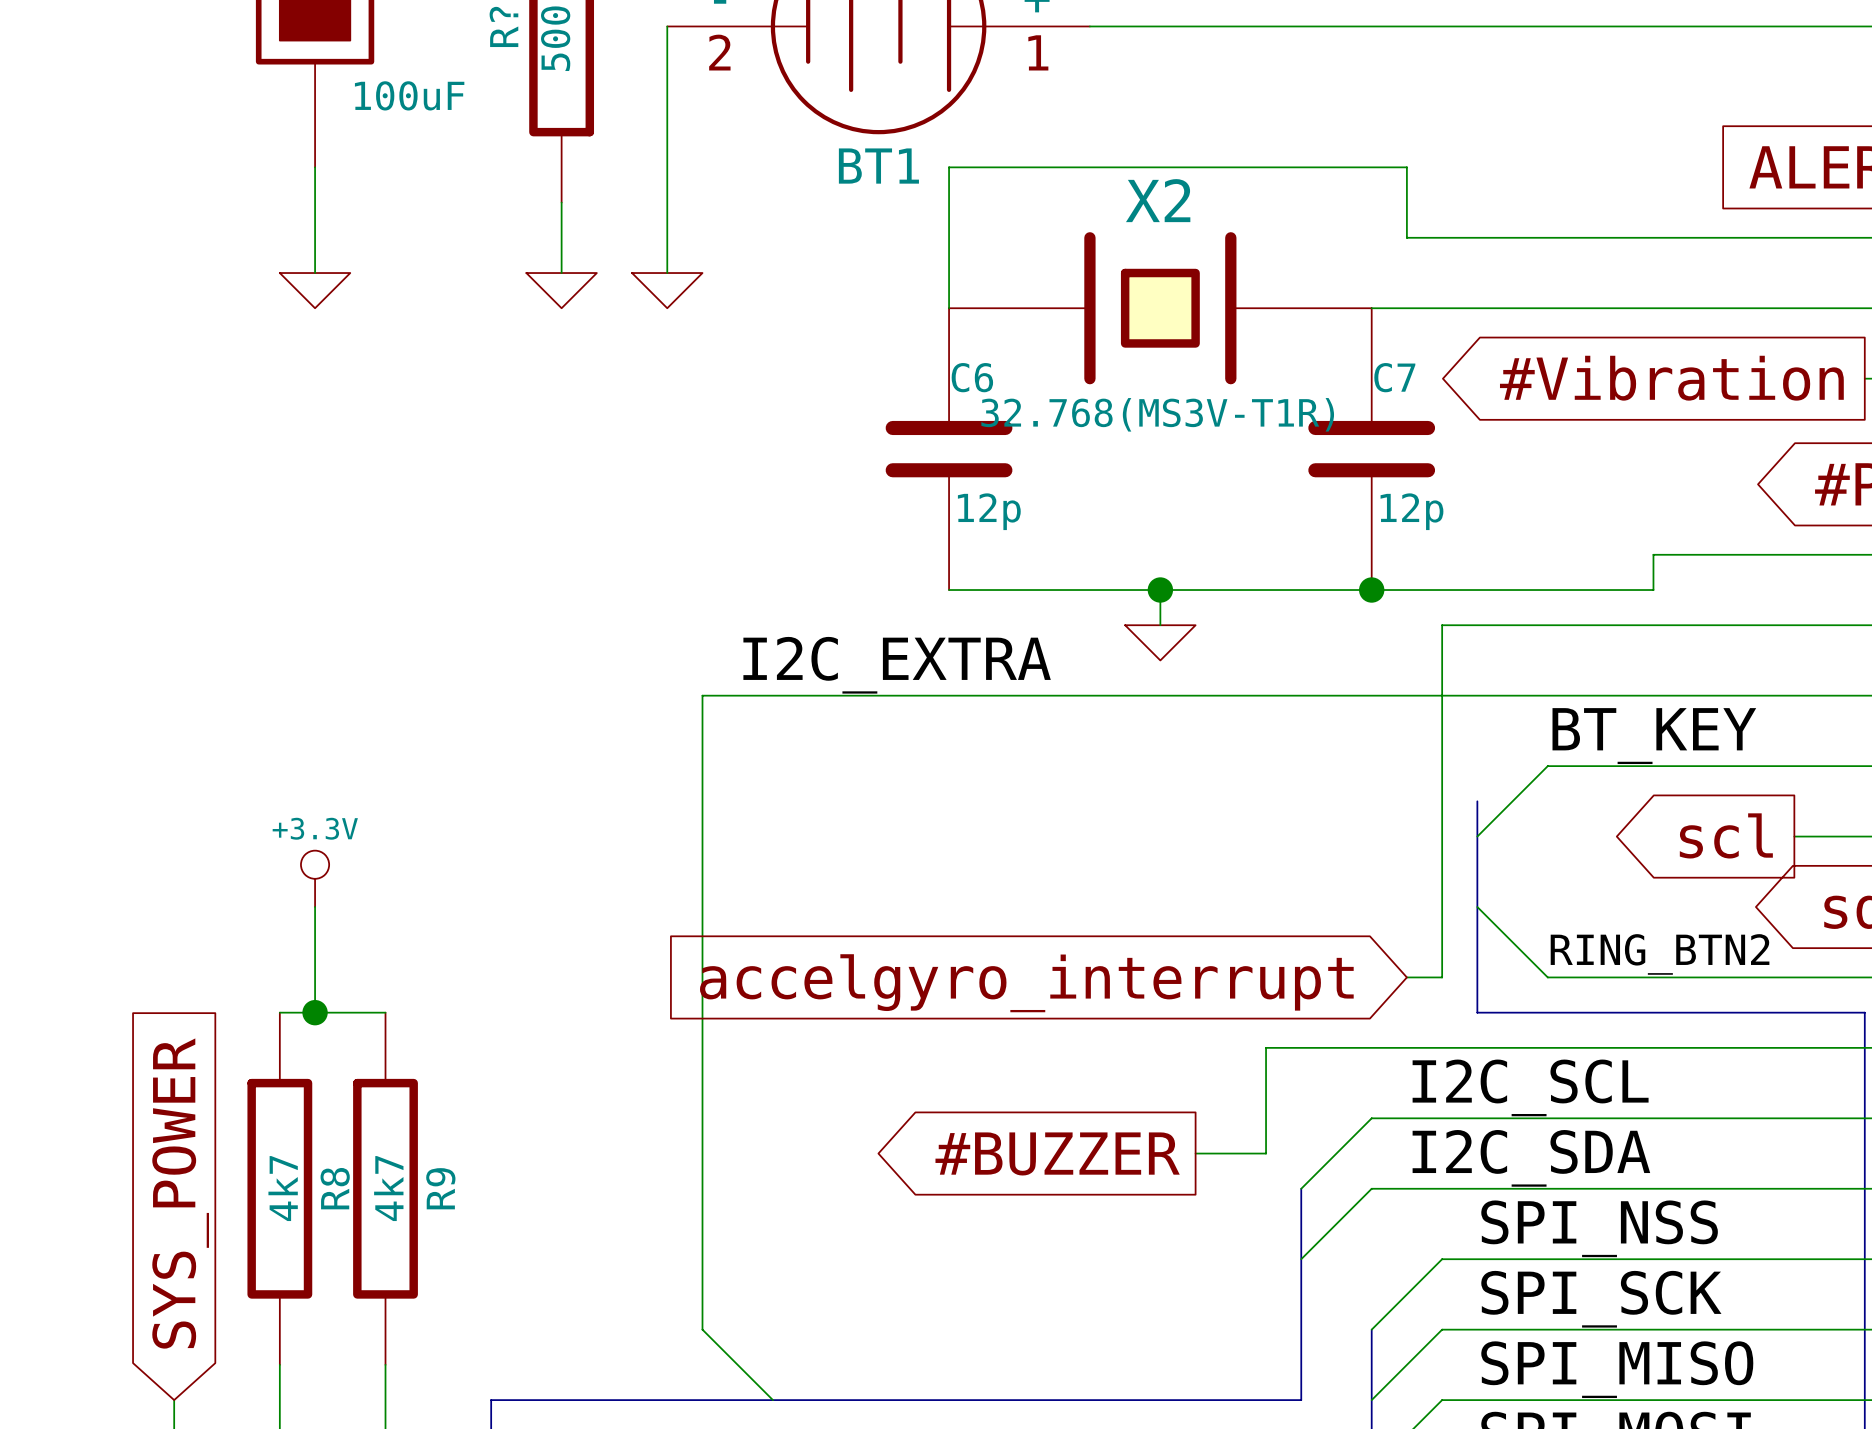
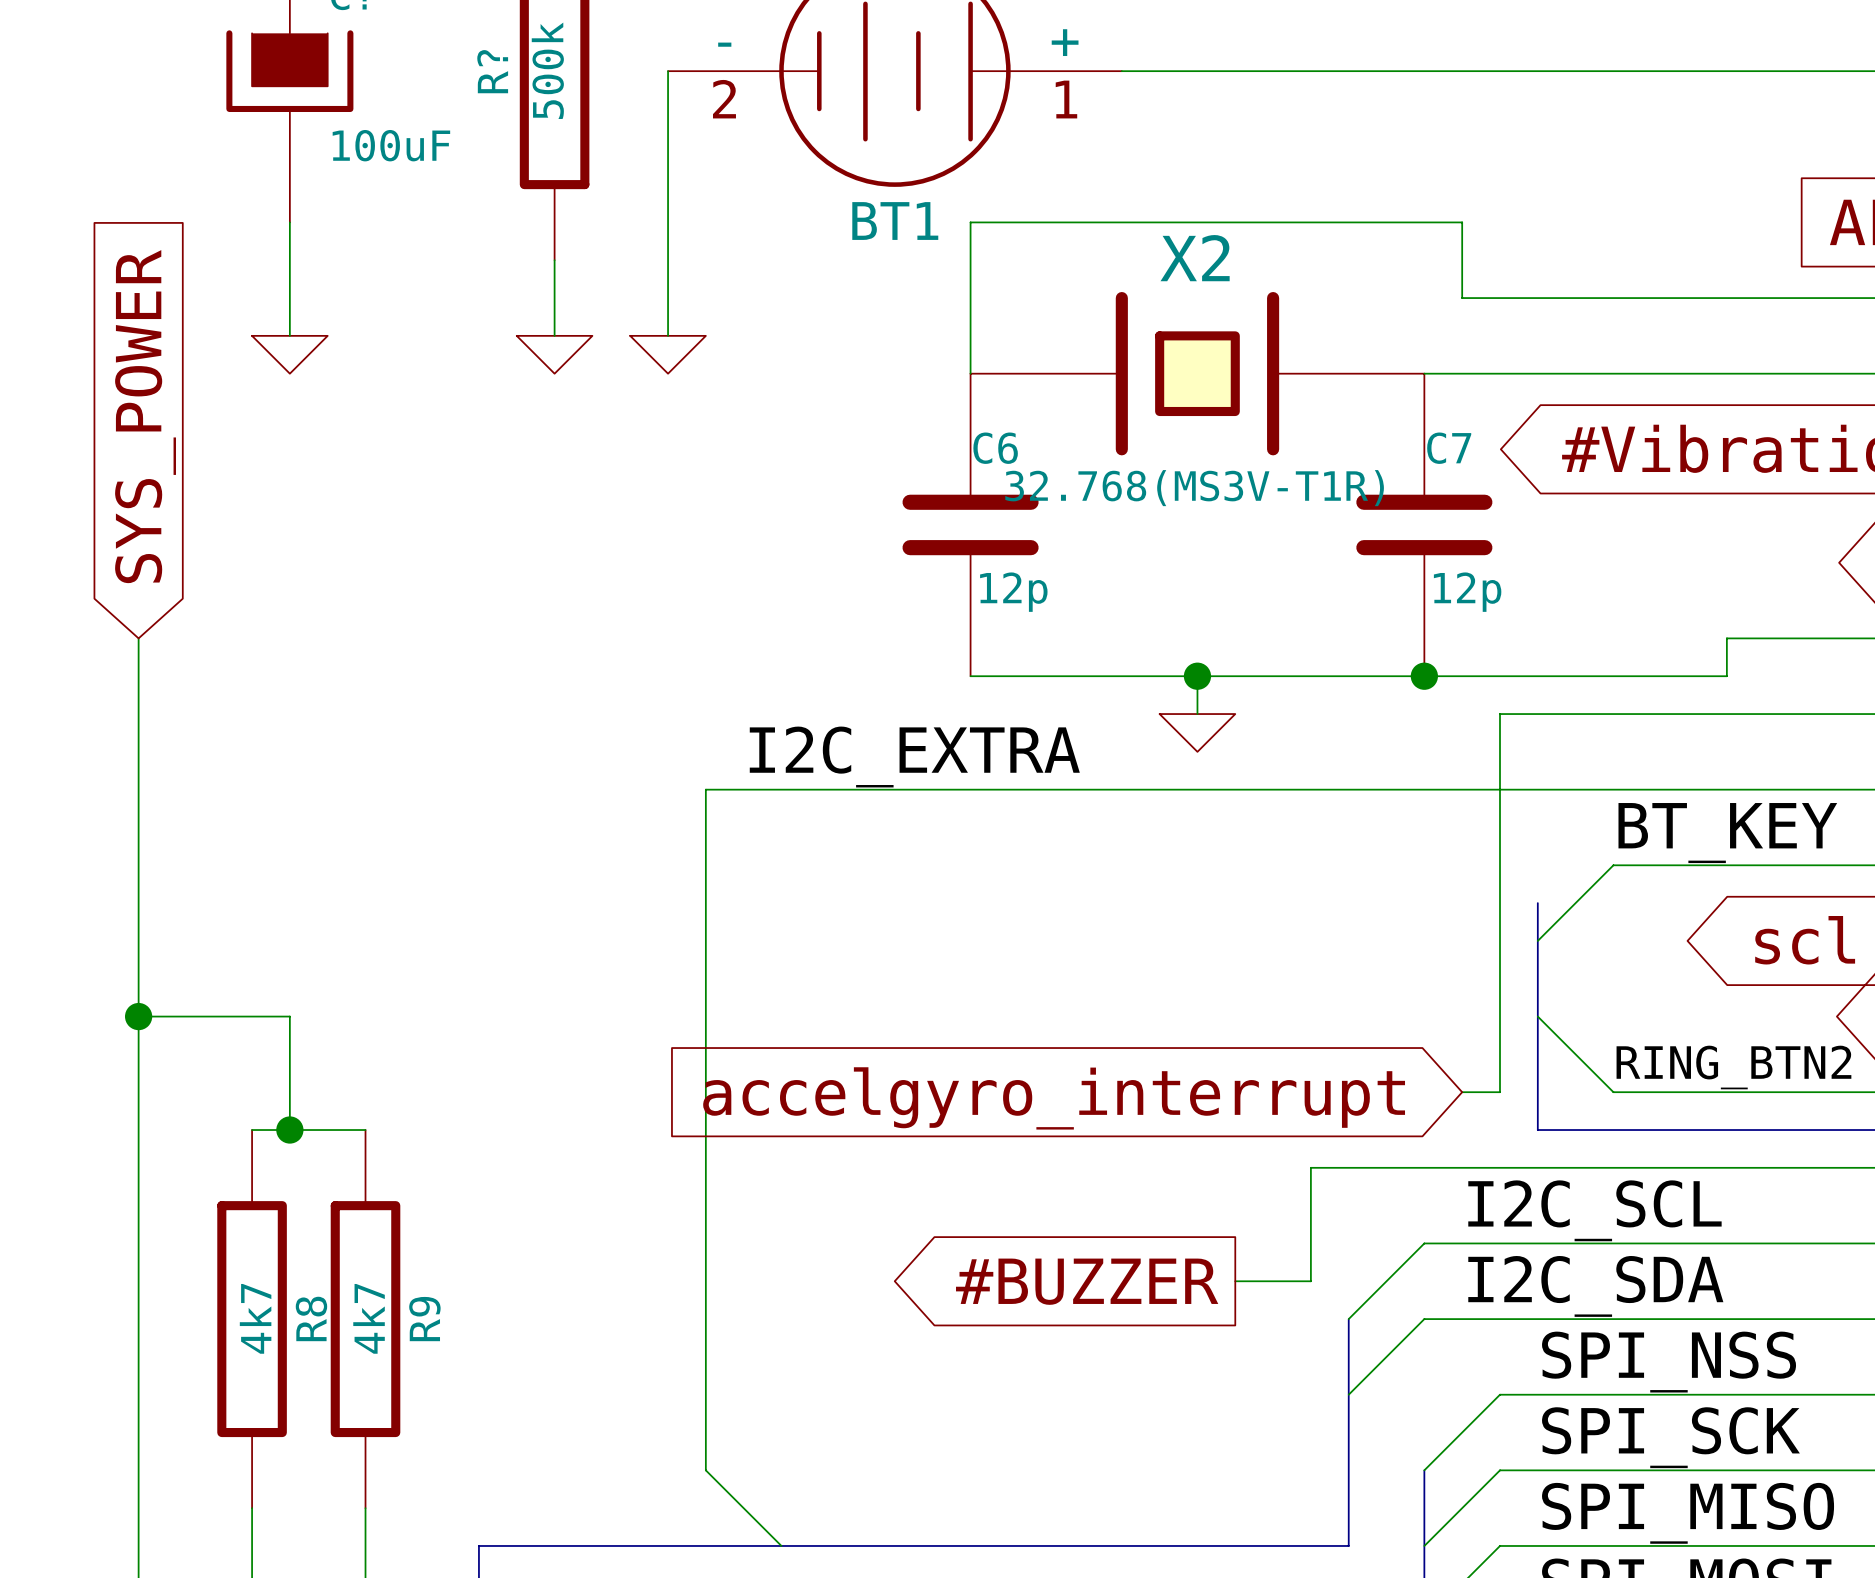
global label: none -> SYS_POWER (145, 416)
wire: none -> (138, 638) (138, 1545)
power symbol: +3.3V (315, 878) -> none
wire: none -> (138, 1016) (289, 1016)
junction: none -> (138, 1016)
global label: SYS_POWER (180, 1193) -> none

